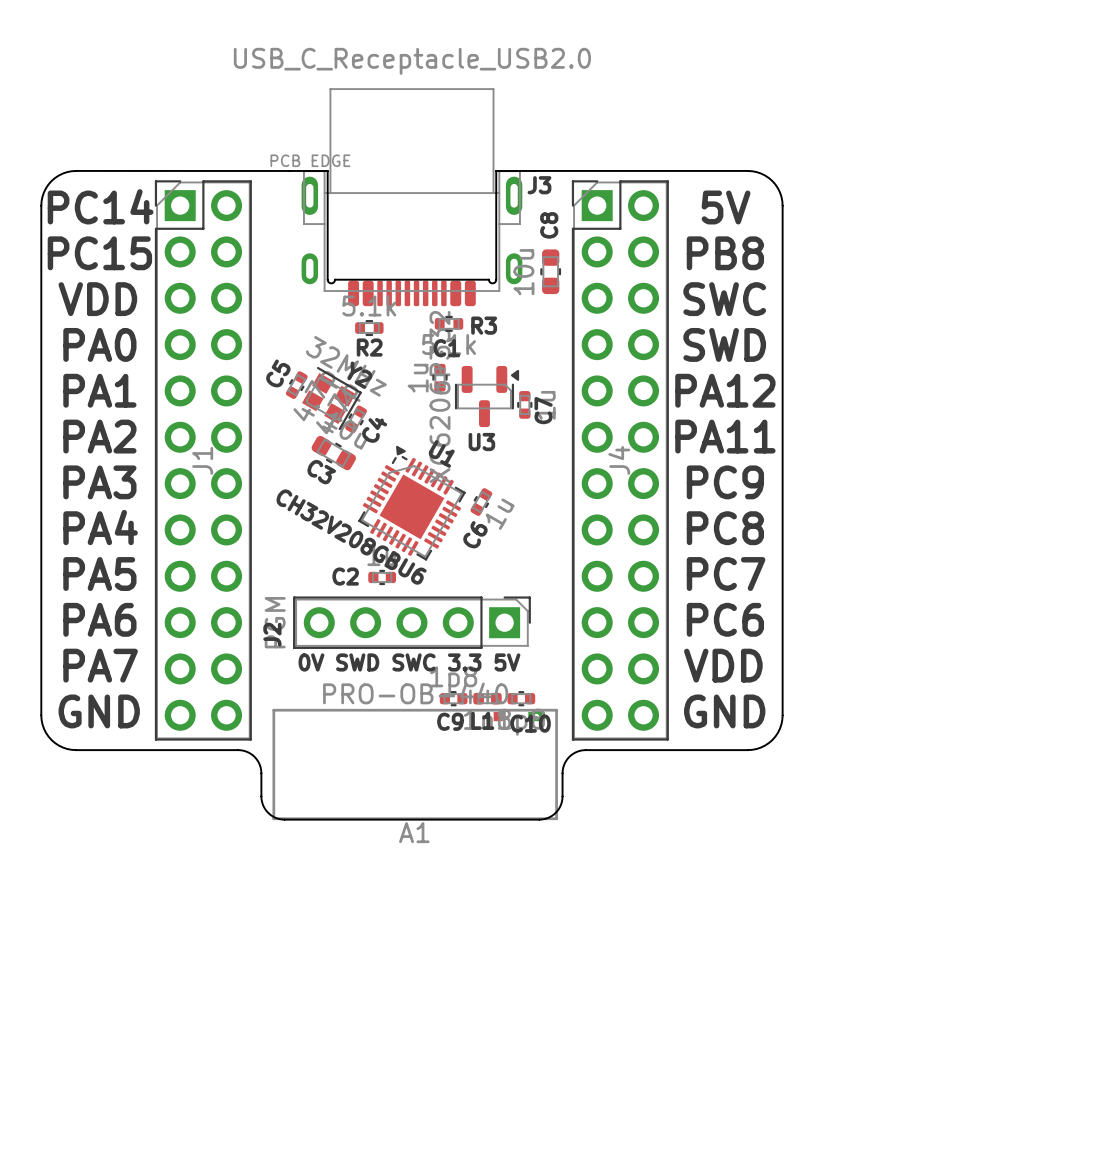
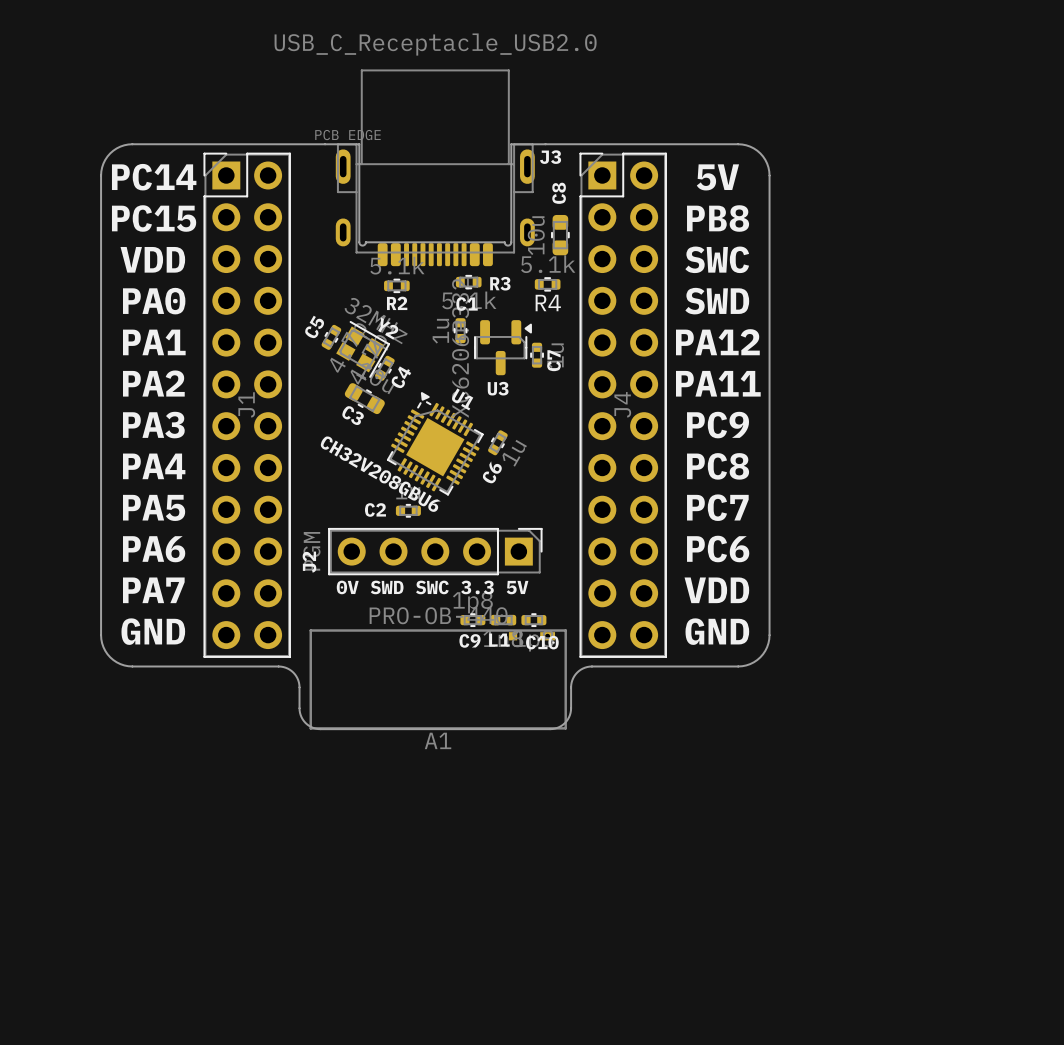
R4: none -> 5.1k (547, 284)

